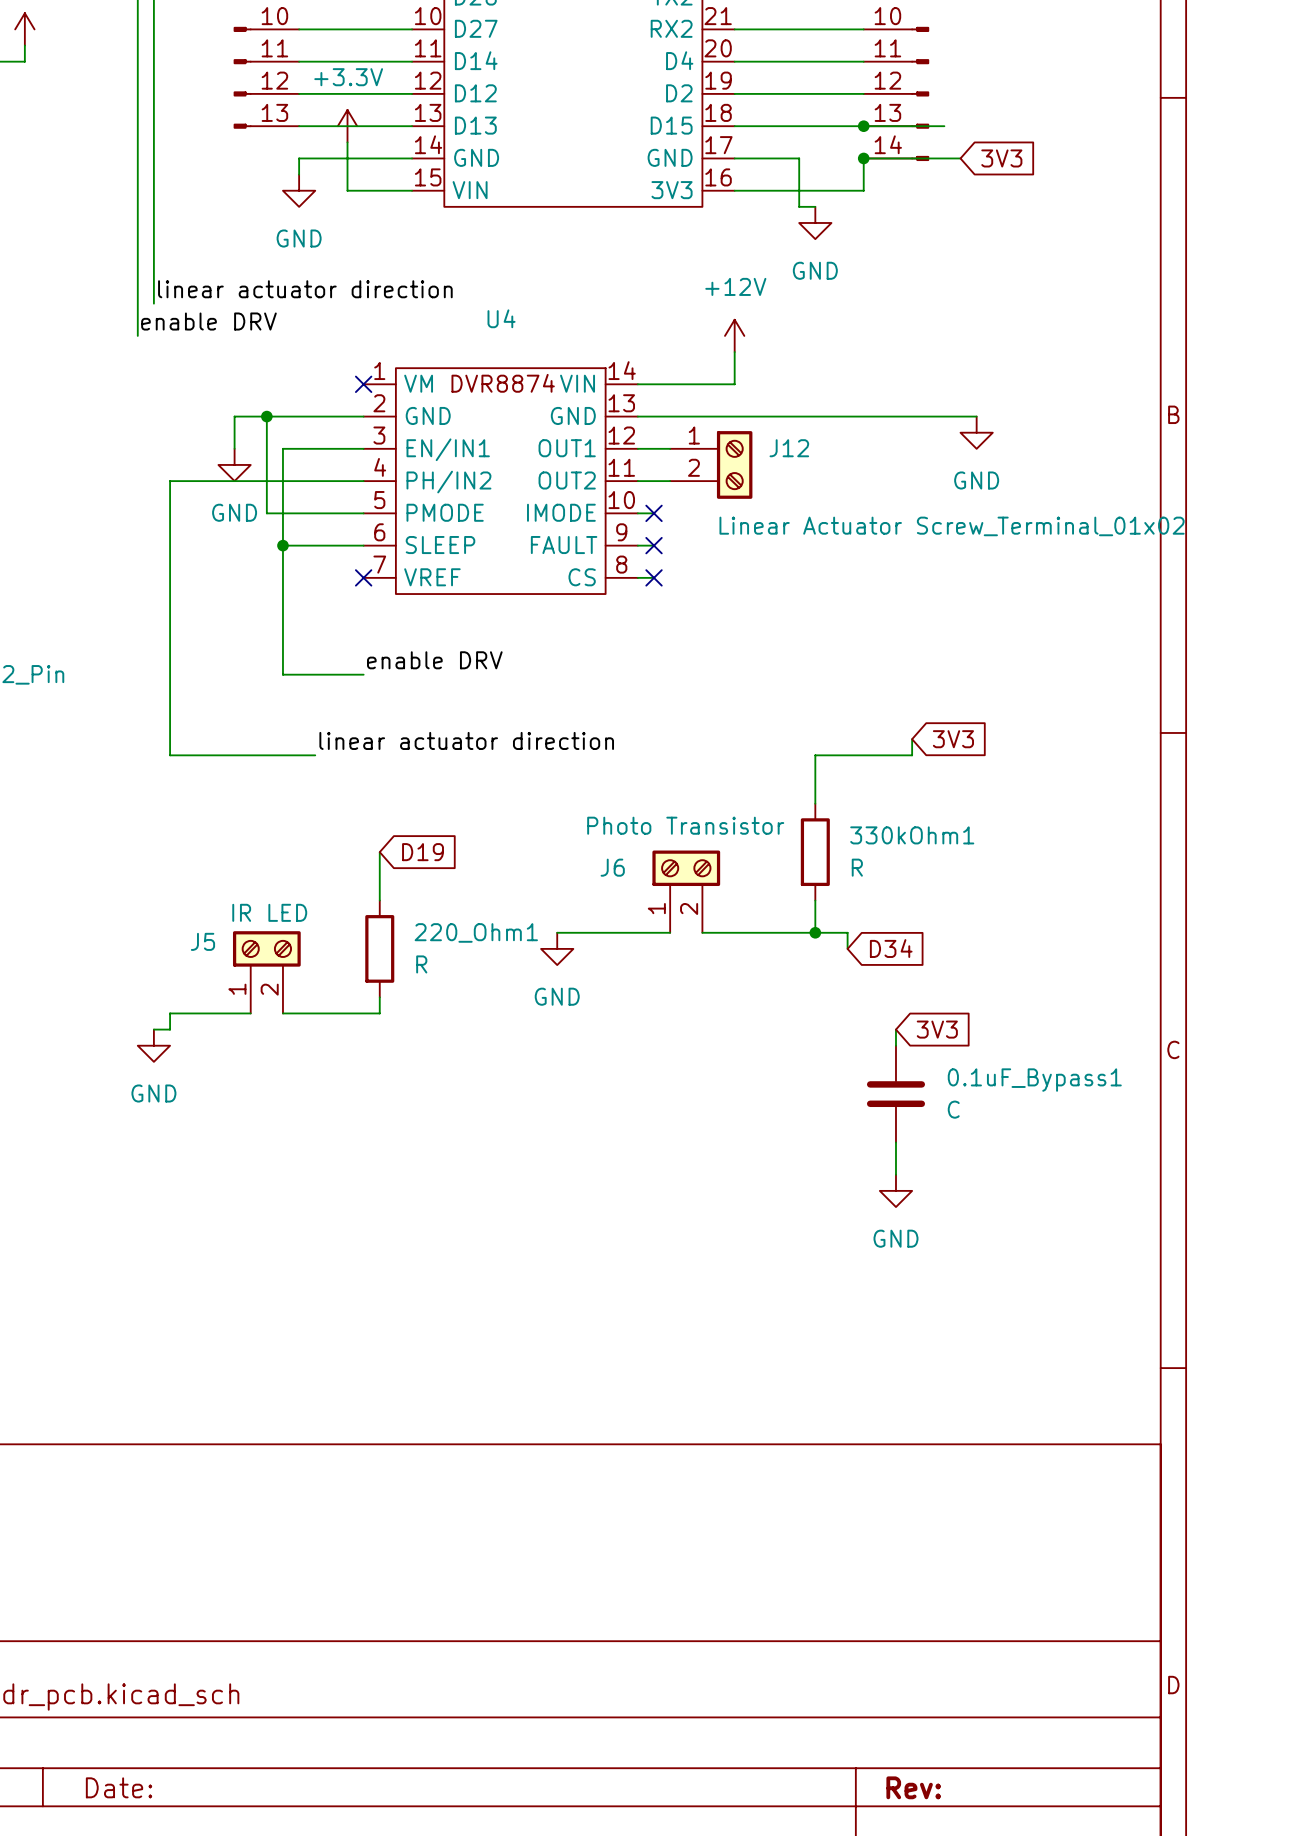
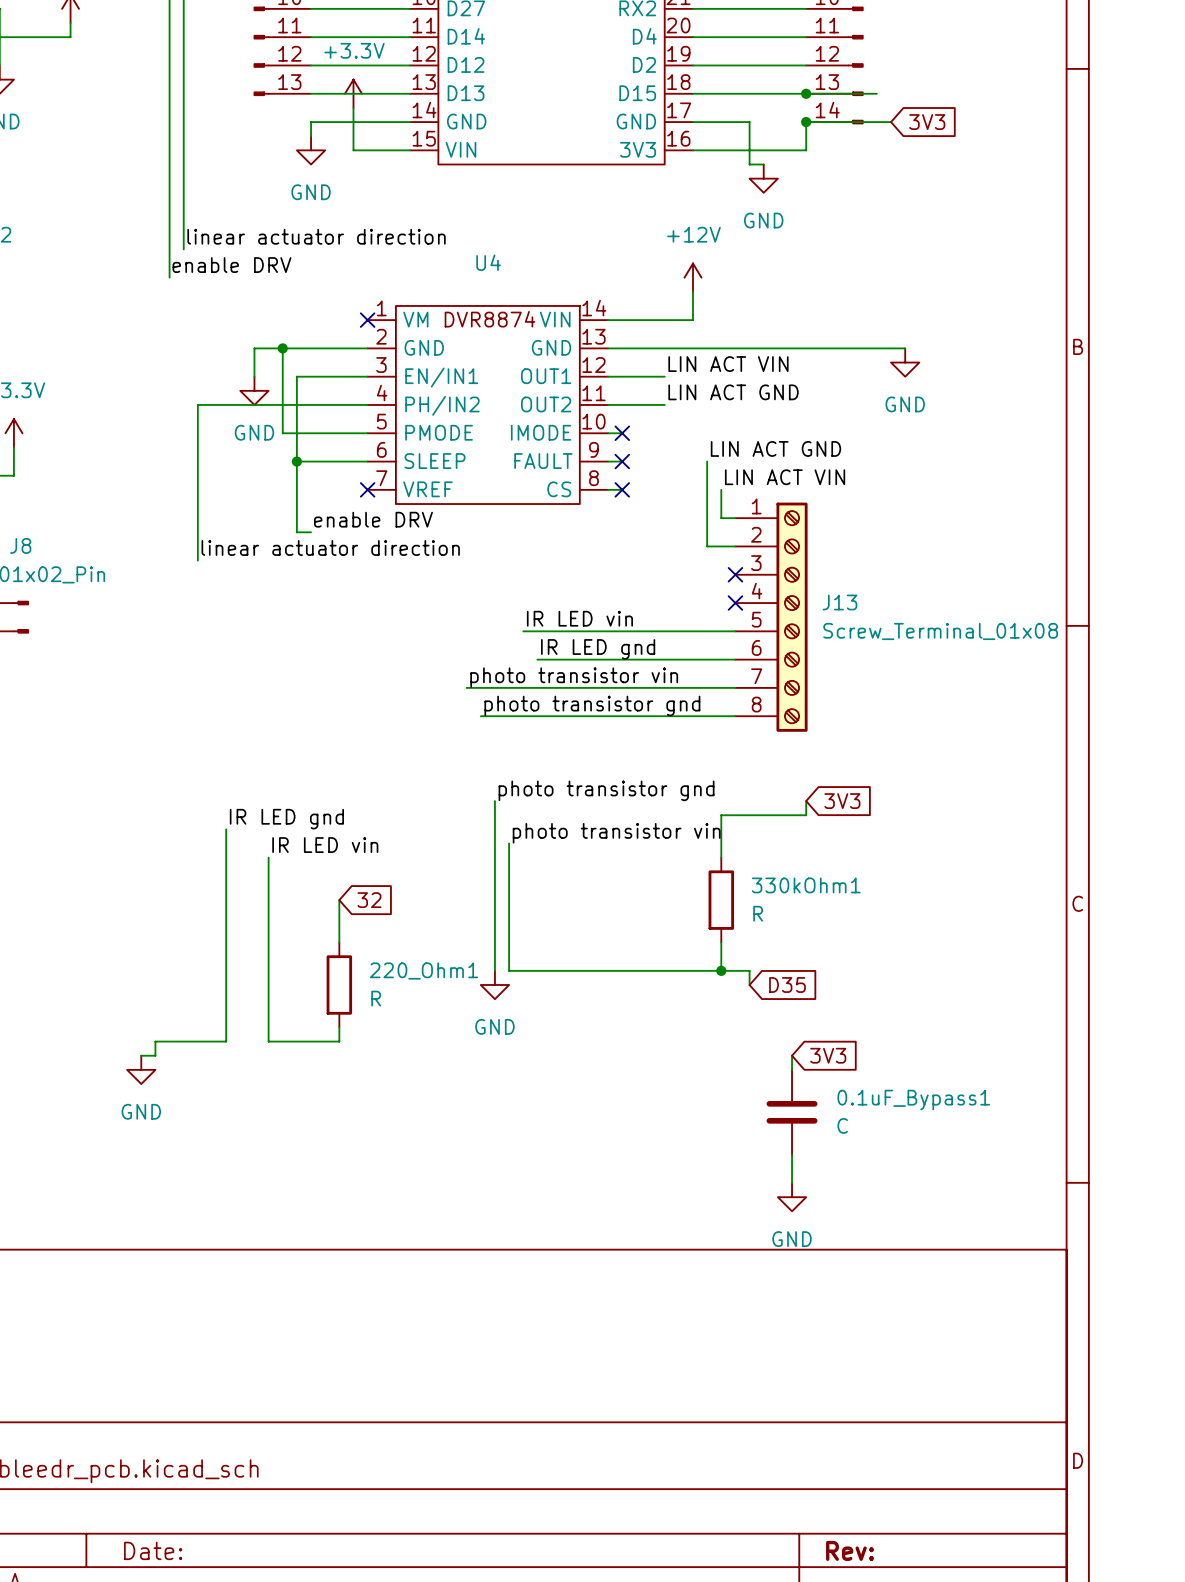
label: none -> LIN ACT VIN (728, 364)
J12: Linear Actuator Screw_Terminal_01x02 (711, 464) -> none
label: none -> LIN ACT GND (733, 392)
label: none -> LIN ACT GND (775, 448)
wire: none -> (707, 461) (707, 546) (735, 546)
label: none -> LIN ACT VIN (785, 477)
wire: none -> (721, 489) (721, 518) (735, 518)
wire: (282, 626) (282, 674) (363, 674) -> (296, 532) (311, 532)
wire: (170, 658) (170, 755) (315, 755) -> none
label position: enable DRV (434, 660) -> enable DRV (373, 519)
no-connect mark: none -> (735, 574)
no-connect mark: none -> (735, 603)
J13: none -> Screw_Terminal_01x08 (771, 617)
label: none -> IR LED vin (579, 618)
wire: none -> (523, 631) (735, 631)
wire: (912, 739) (912, 755) (815, 755) (815, 803) -> (806, 801) (806, 815) (721, 815) (721, 857)
global label: 3V3 (953, 739) -> none
label position: linear actuator direction (466, 740) -> linear actuator direction (330, 547)
label: none -> IR LED gnd (598, 649)
wire: none -> (537, 659) (735, 659)
label: none -> photo transistor vin (574, 677)
wire: none -> (466, 687) (735, 687)
label: none -> photo transistor gnd (592, 705)
wire: none -> (480, 716) (735, 716)
wire: (379, 852) (379, 900) -> (339, 900) (339, 942)
global label: D19 (423, 852) -> none
330kOhm1 position: (815, 852) -> (721, 900)
J6: Photo Transistor (686, 891) -> none
wire: (815, 900) (815, 932) -> (721, 942) (721, 970)
label: none -> photo transistor gnd (606, 790)
wire: none -> (494, 801) (494, 970)
wire: (557, 932) (670, 932) -> none
wire: (702, 932) (847, 932) (847, 948) -> none
junction: (815, 932) -> none
global label: none -> 3V3 (842, 801)
220_Ohm1 position: (379, 948) -> (339, 985)
power symbol: GND (557, 948) -> none
global label: D34 (891, 948) -> none
label: none -> IR LED gnd (286, 819)
wire: none -> (226, 829) (226, 1041) (155, 1041) (155, 1055) (141, 1055)
label: none -> photo transistor vin (616, 833)
J5: IR LED (266, 972) -> none
wire: none -> (509, 843) (509, 970) (749, 970) (749, 985)
label: none -> IR LED vin (325, 845)
wire: none -> (268, 857) (268, 1041) (339, 1041) (339, 1027)
wire: (379, 997) (379, 1013) (282, 1013) -> none
wire: (250, 1013) (170, 1013) (170, 1029) (153, 1029) -> none
wire: (895, 1029) (895, 1045) -> (792, 1055) (792, 1069)
global label: 3V3 (937, 1029) -> none
power symbol: GND (153, 1045) -> none
global label: none -> 32 (369, 900)
0.1uF_Bypass1 position: (895, 1094) -> (792, 1112)
junction: none -> (721, 970)
power symbol: none -> GND (494, 985)
global label: none -> D35 (787, 985)
wire: (895, 1142) (895, 1174) -> (792, 1154) (792, 1183)
power symbol: GND (895, 1190) -> none
global label: none -> 3V3 (828, 1055)
power symbol: none -> GND (141, 1069)
power symbol: none -> GND (792, 1197)

